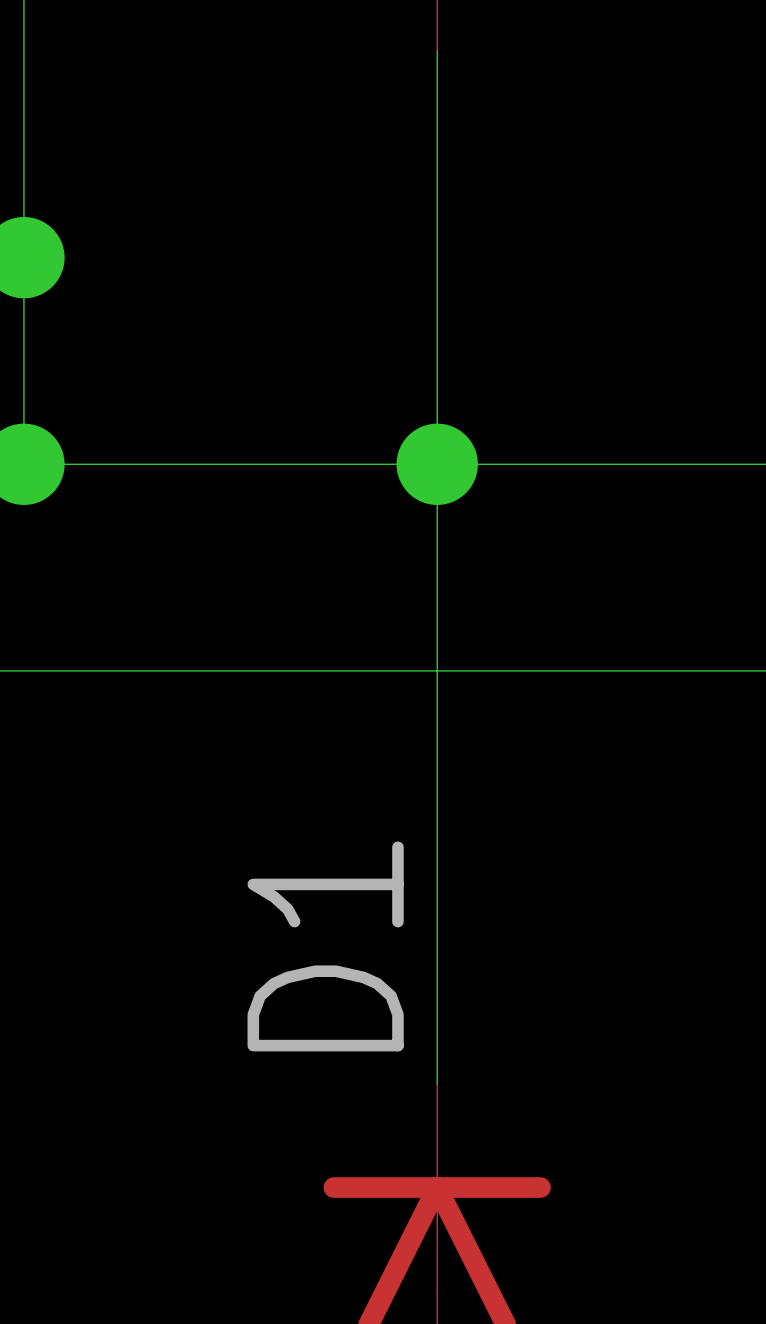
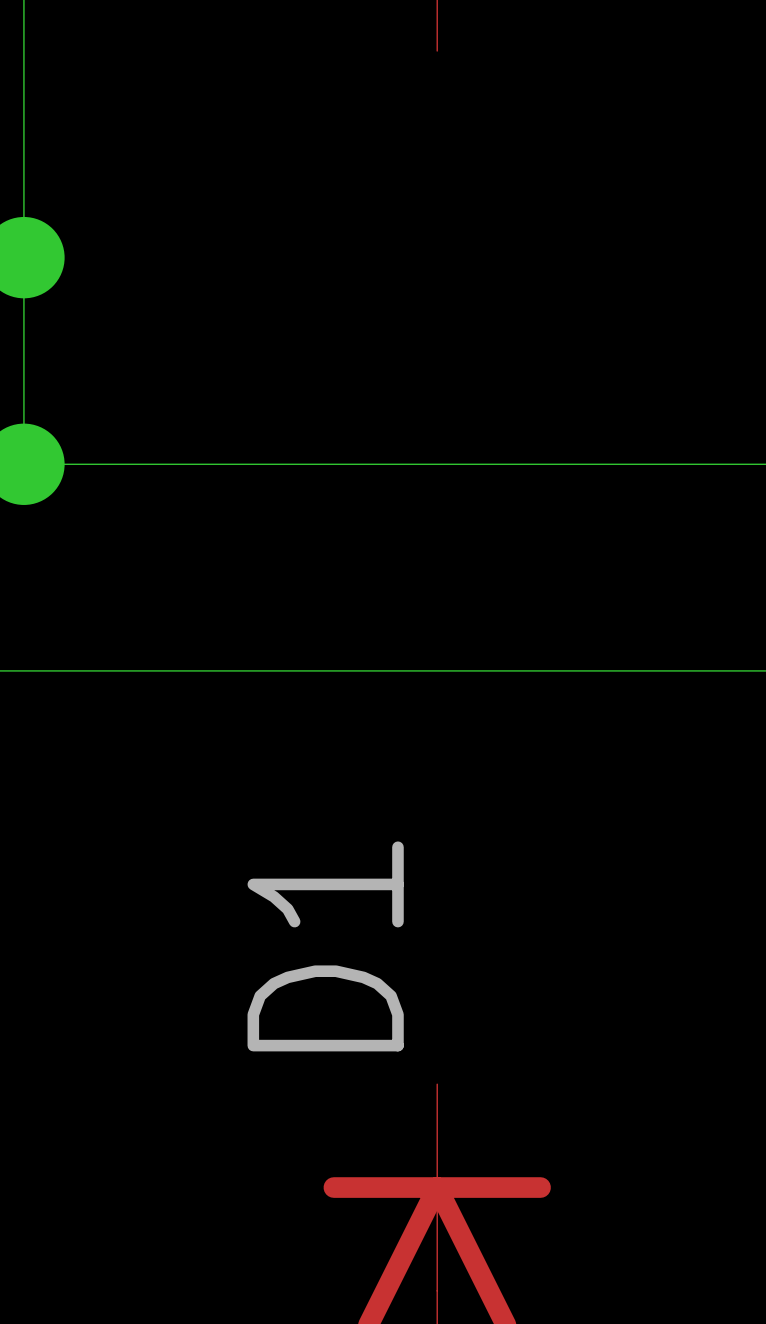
wire: (437, 51) (437, 1084) -> none
junction: (437, 464) -> none

